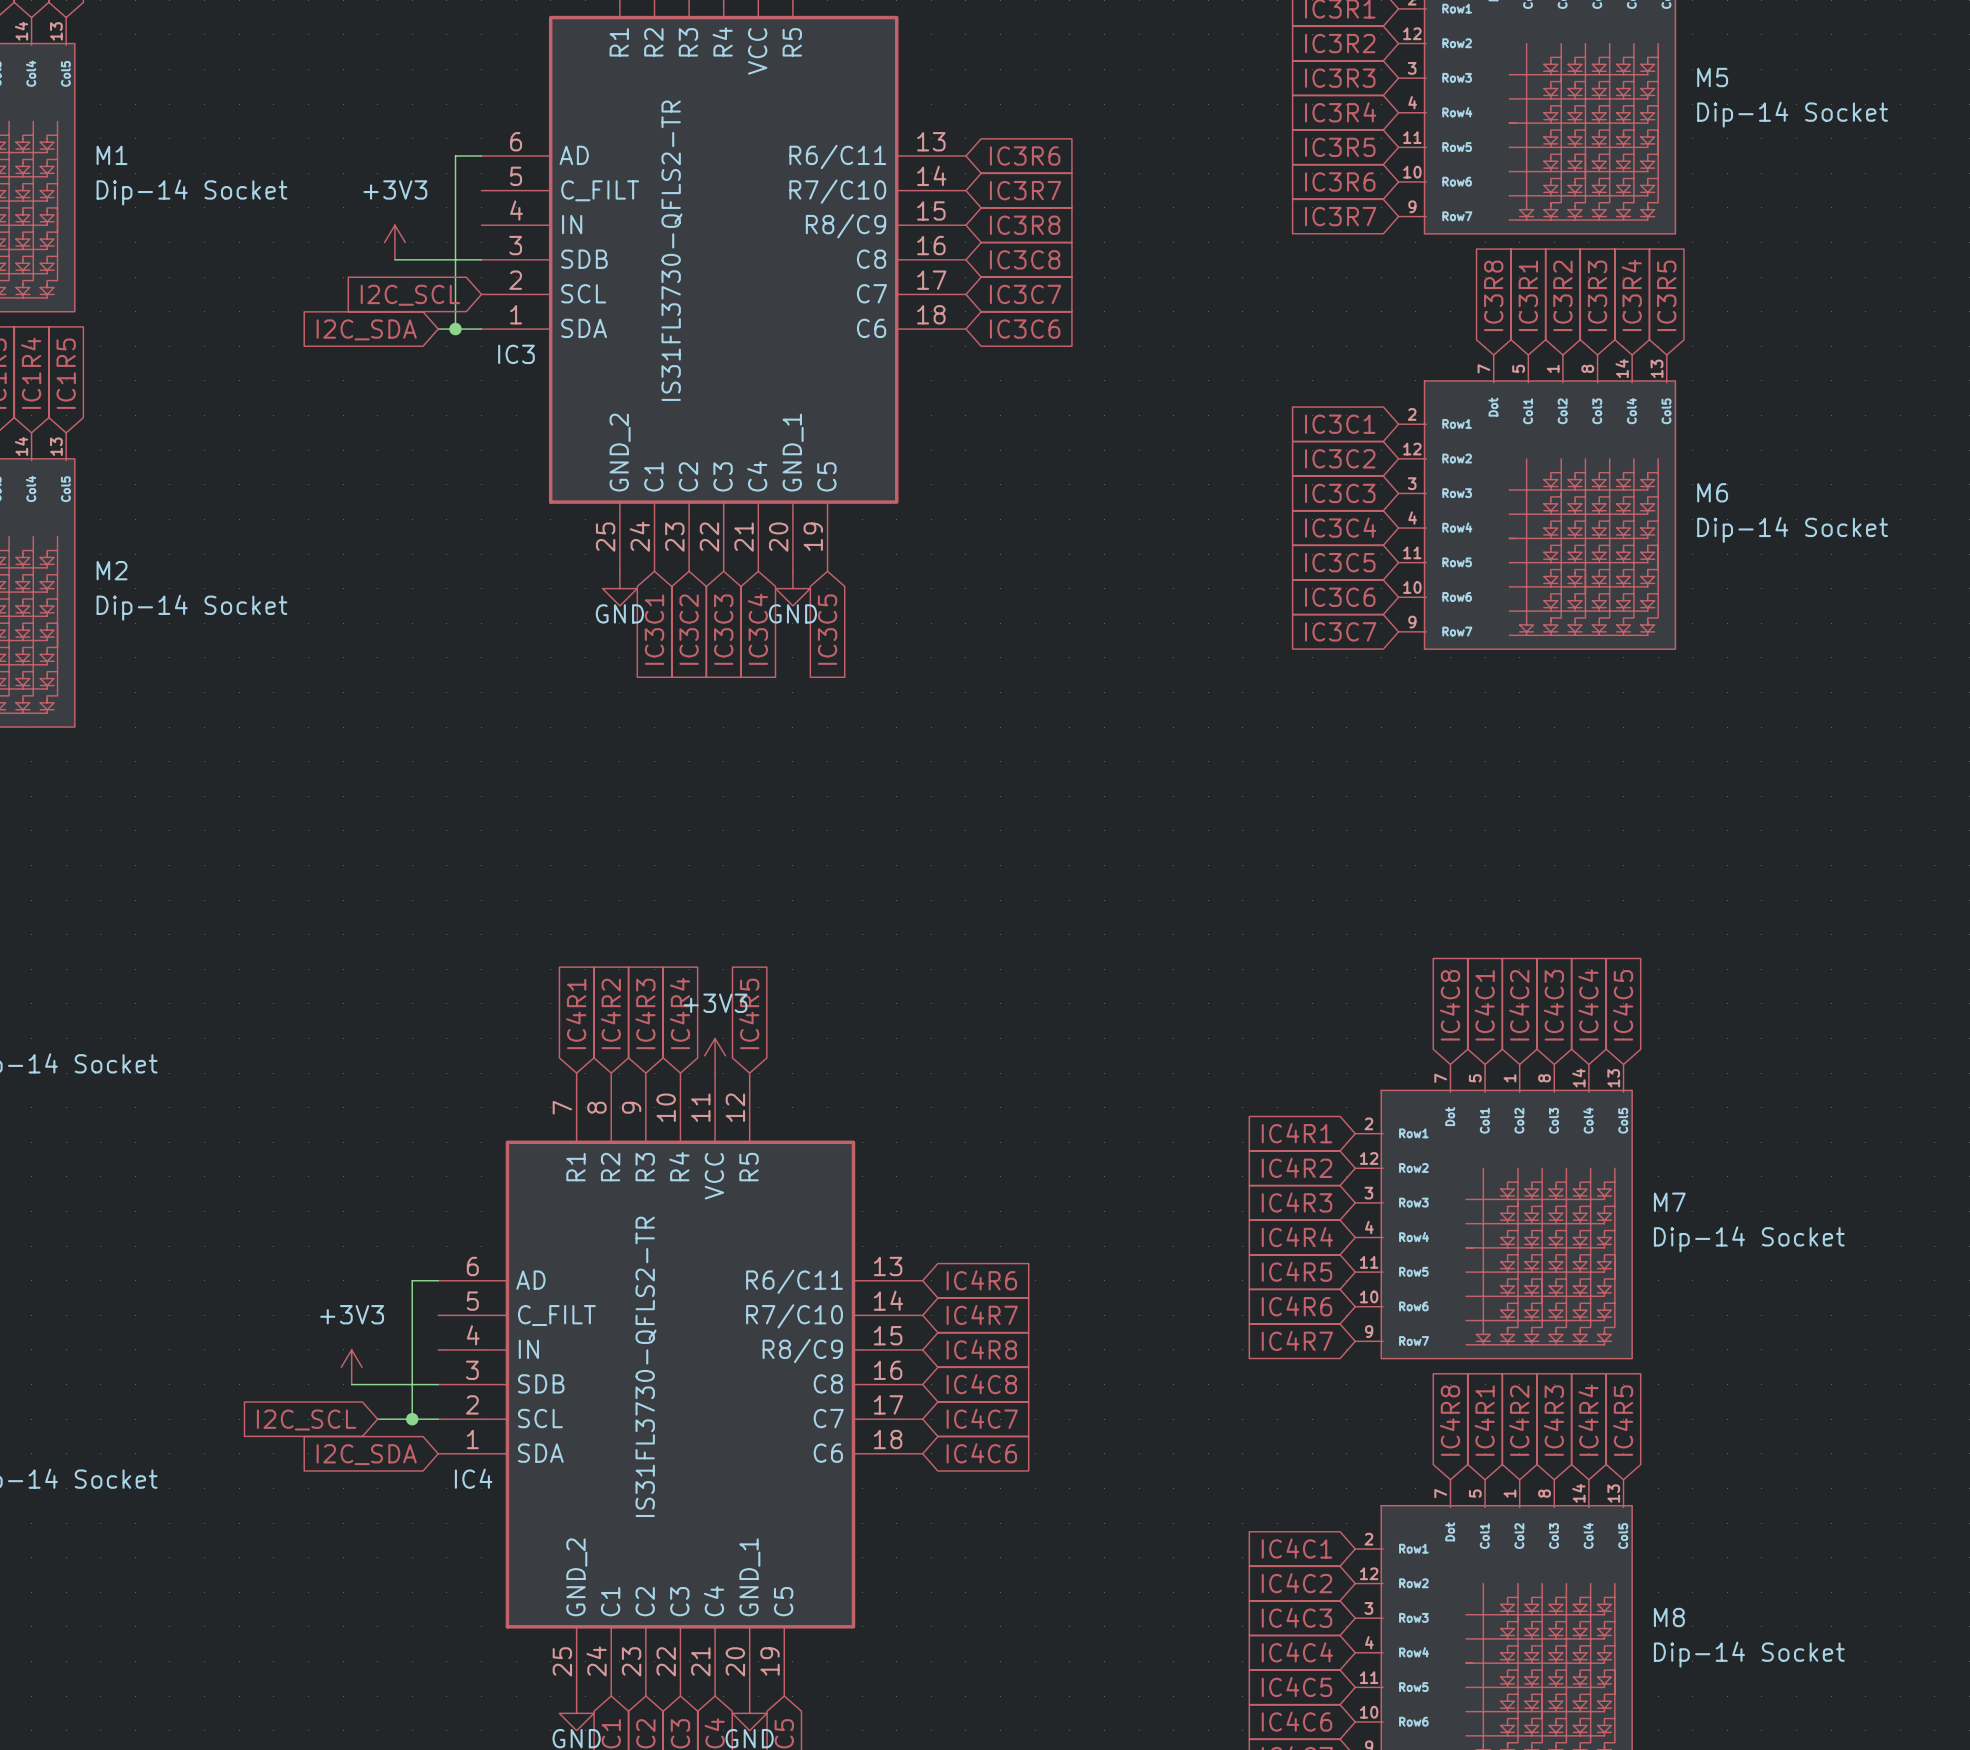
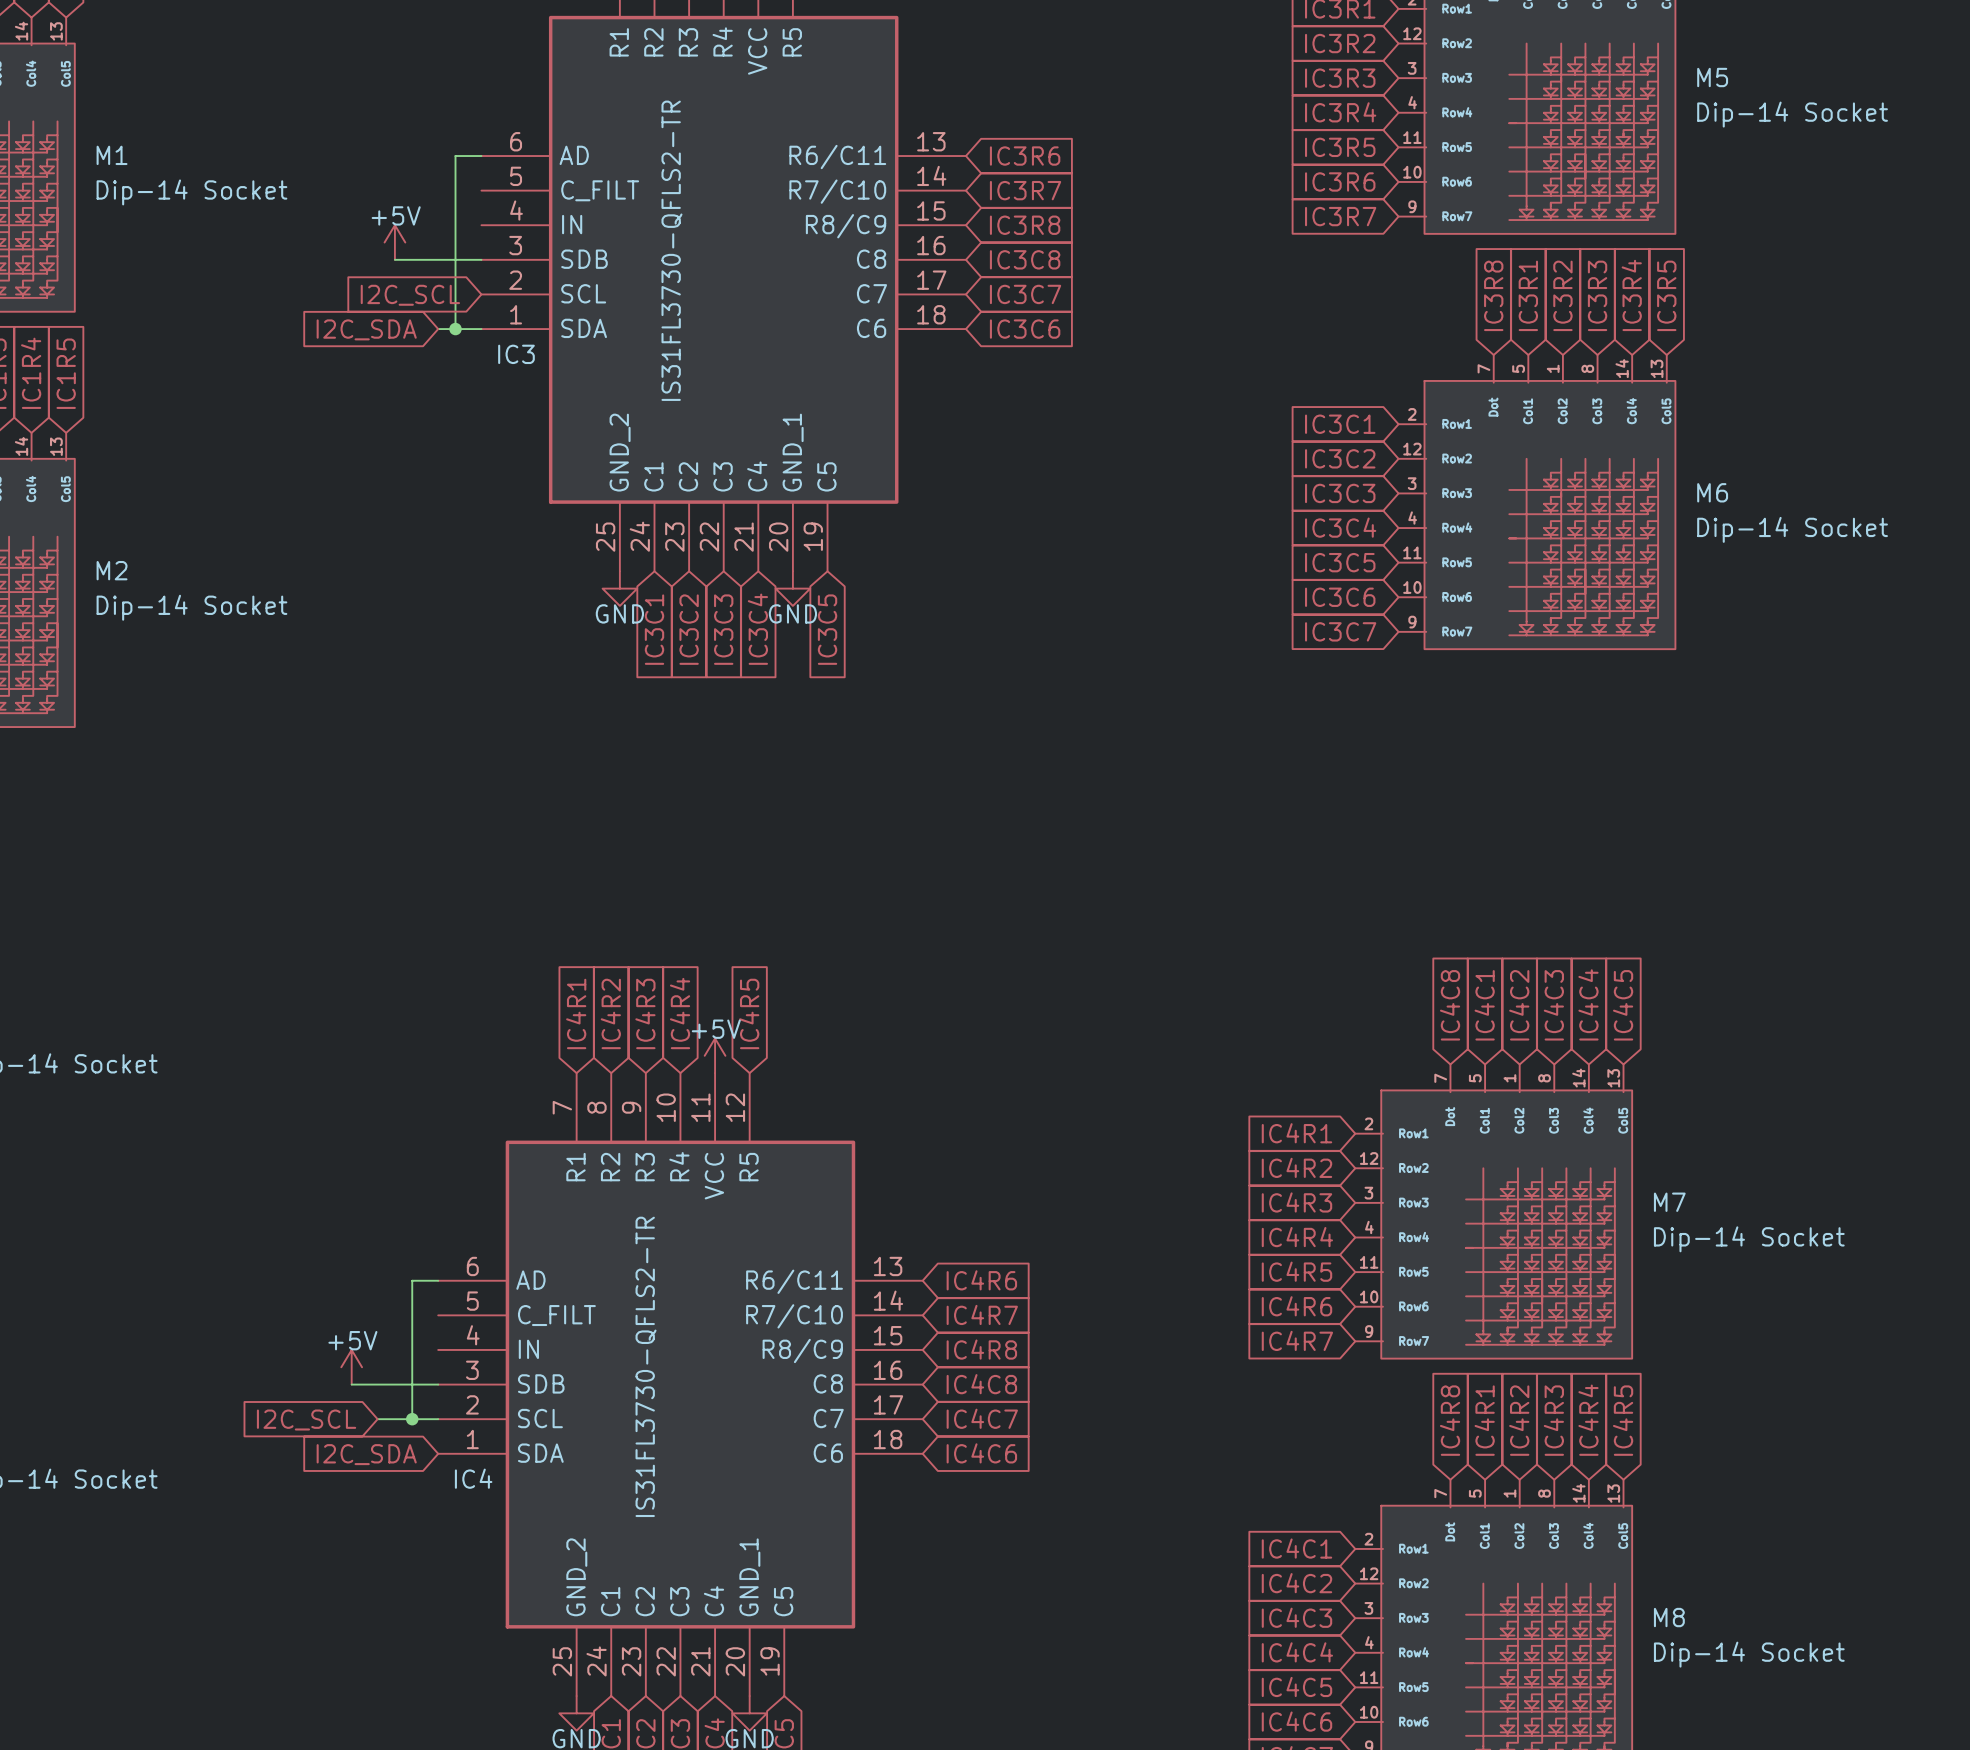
power symbol: +3V3 (394, 242) -> +5V (394, 242)
power symbol: +3V3 (715, 1055) -> +5V (715, 1055)
power symbol: +3V3 (351, 1367) -> +5V (351, 1367)

